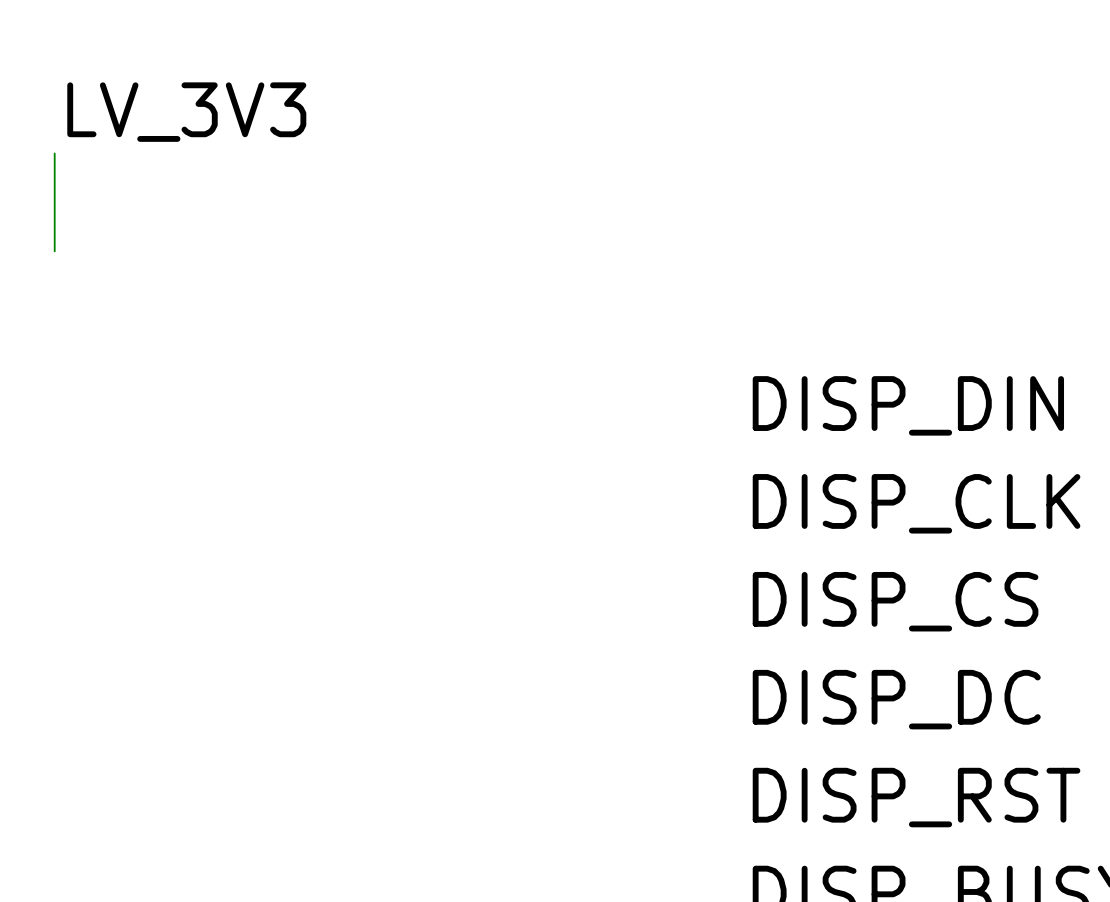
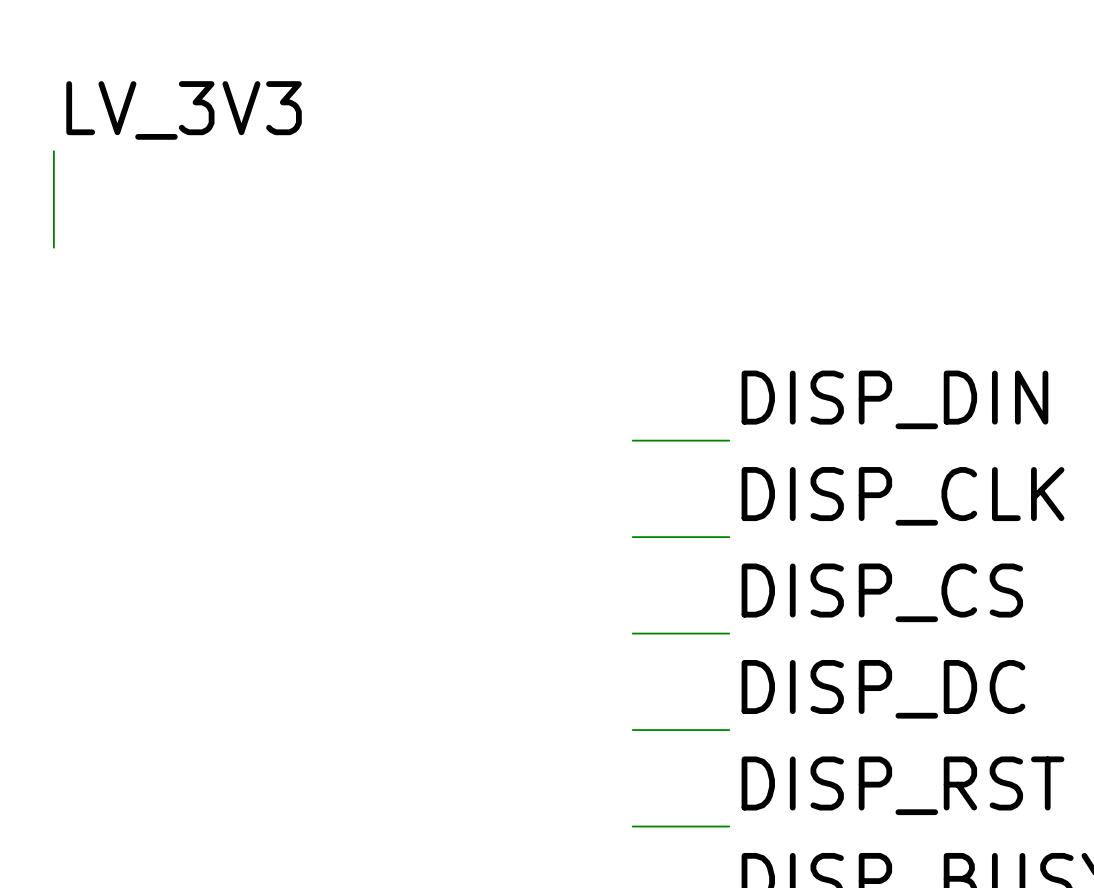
wire: none -> (632, 440) (729, 440)
wire: none -> (632, 537) (729, 537)
wire: none -> (632, 633) (729, 633)
wire: none -> (632, 730) (729, 730)
wire: none -> (632, 826) (729, 826)

